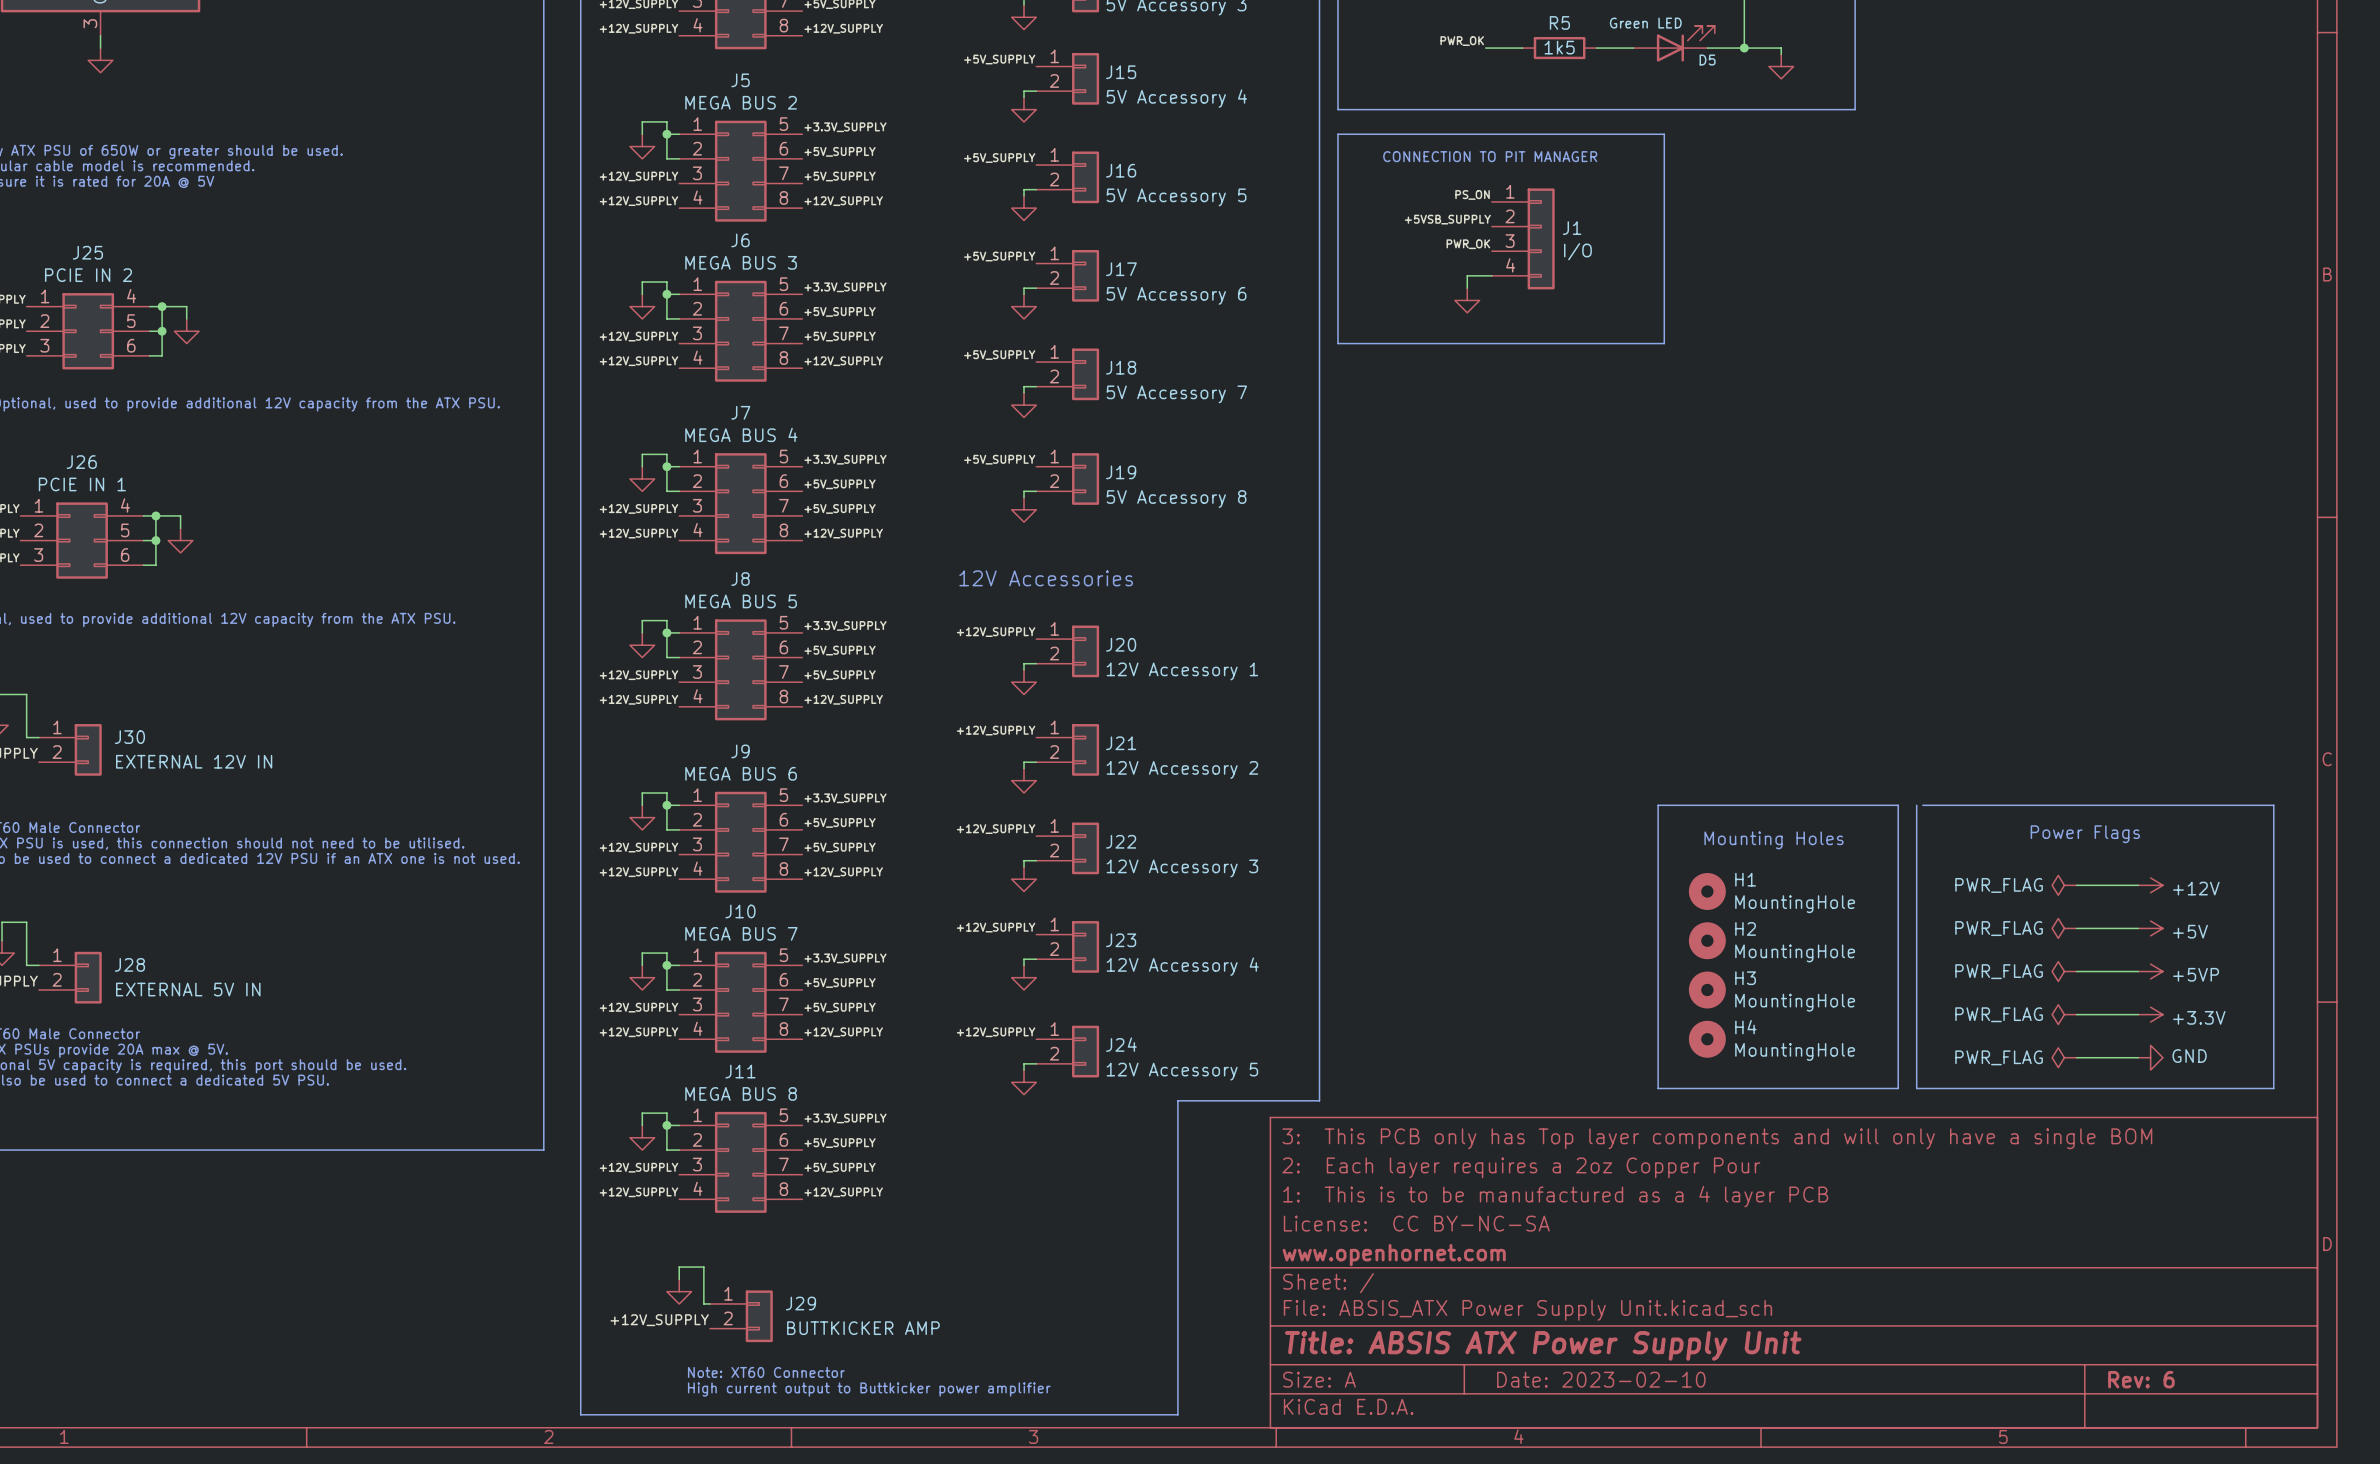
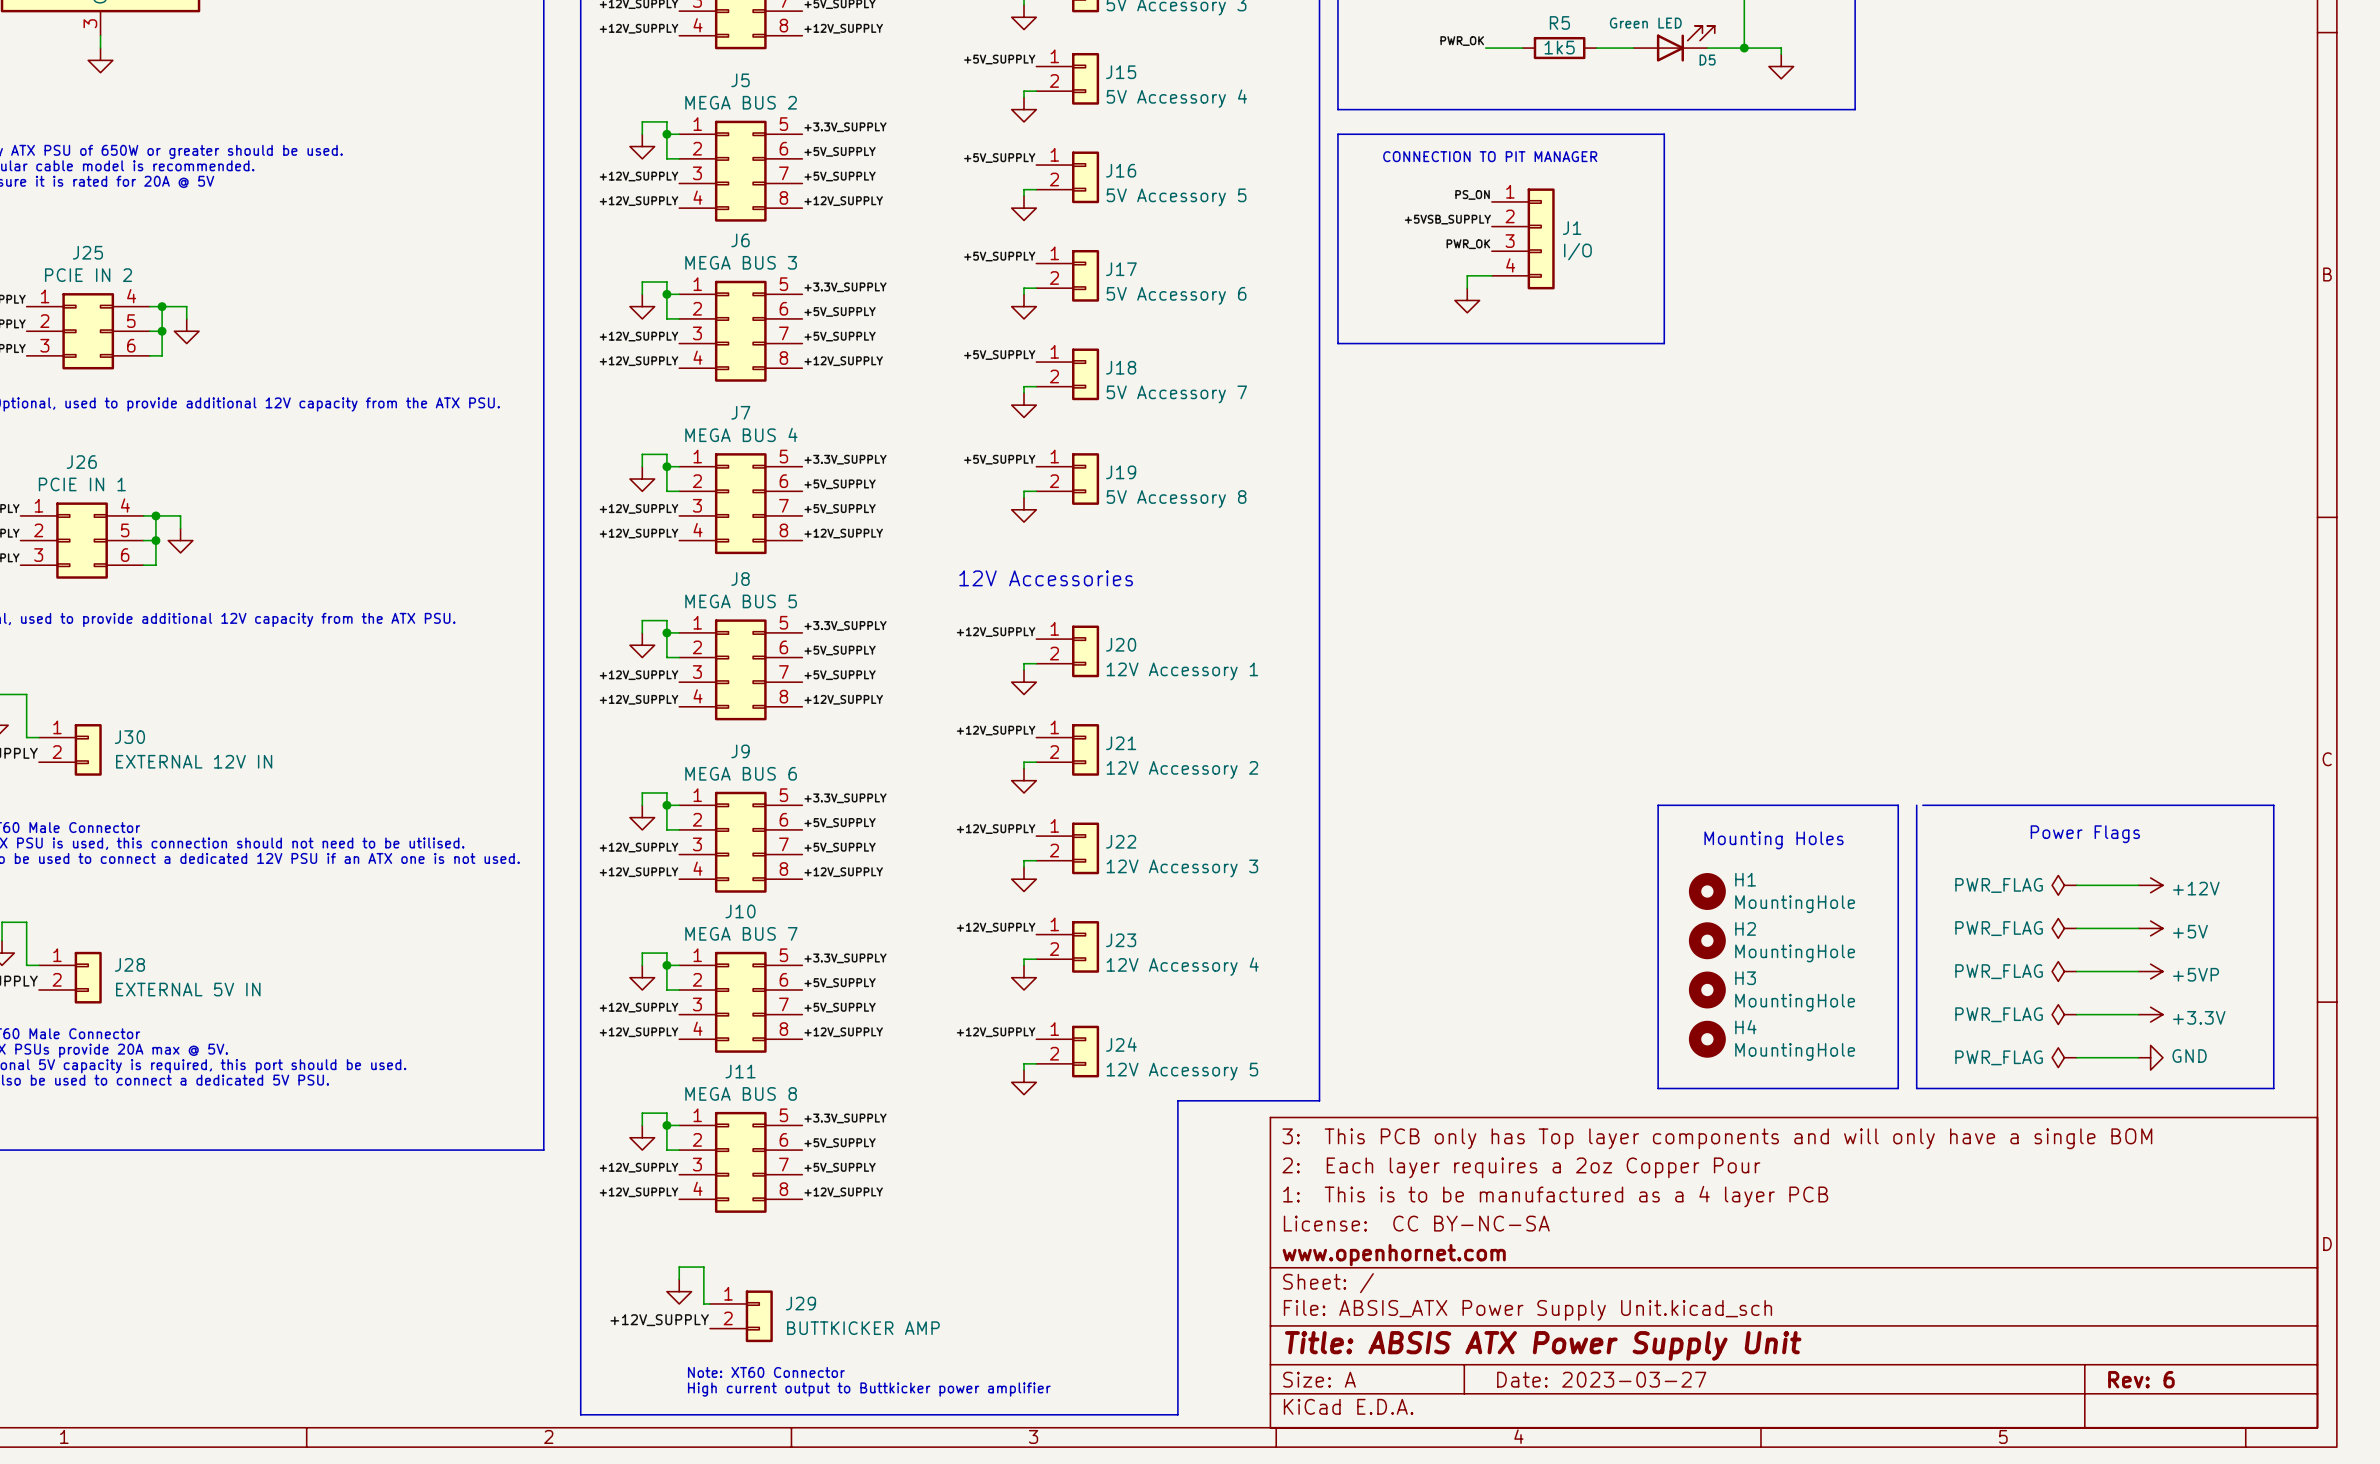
title block: Date: 2023-02-10 (1601, 1379) -> Date: 2023-03-27 (1601, 1379)

